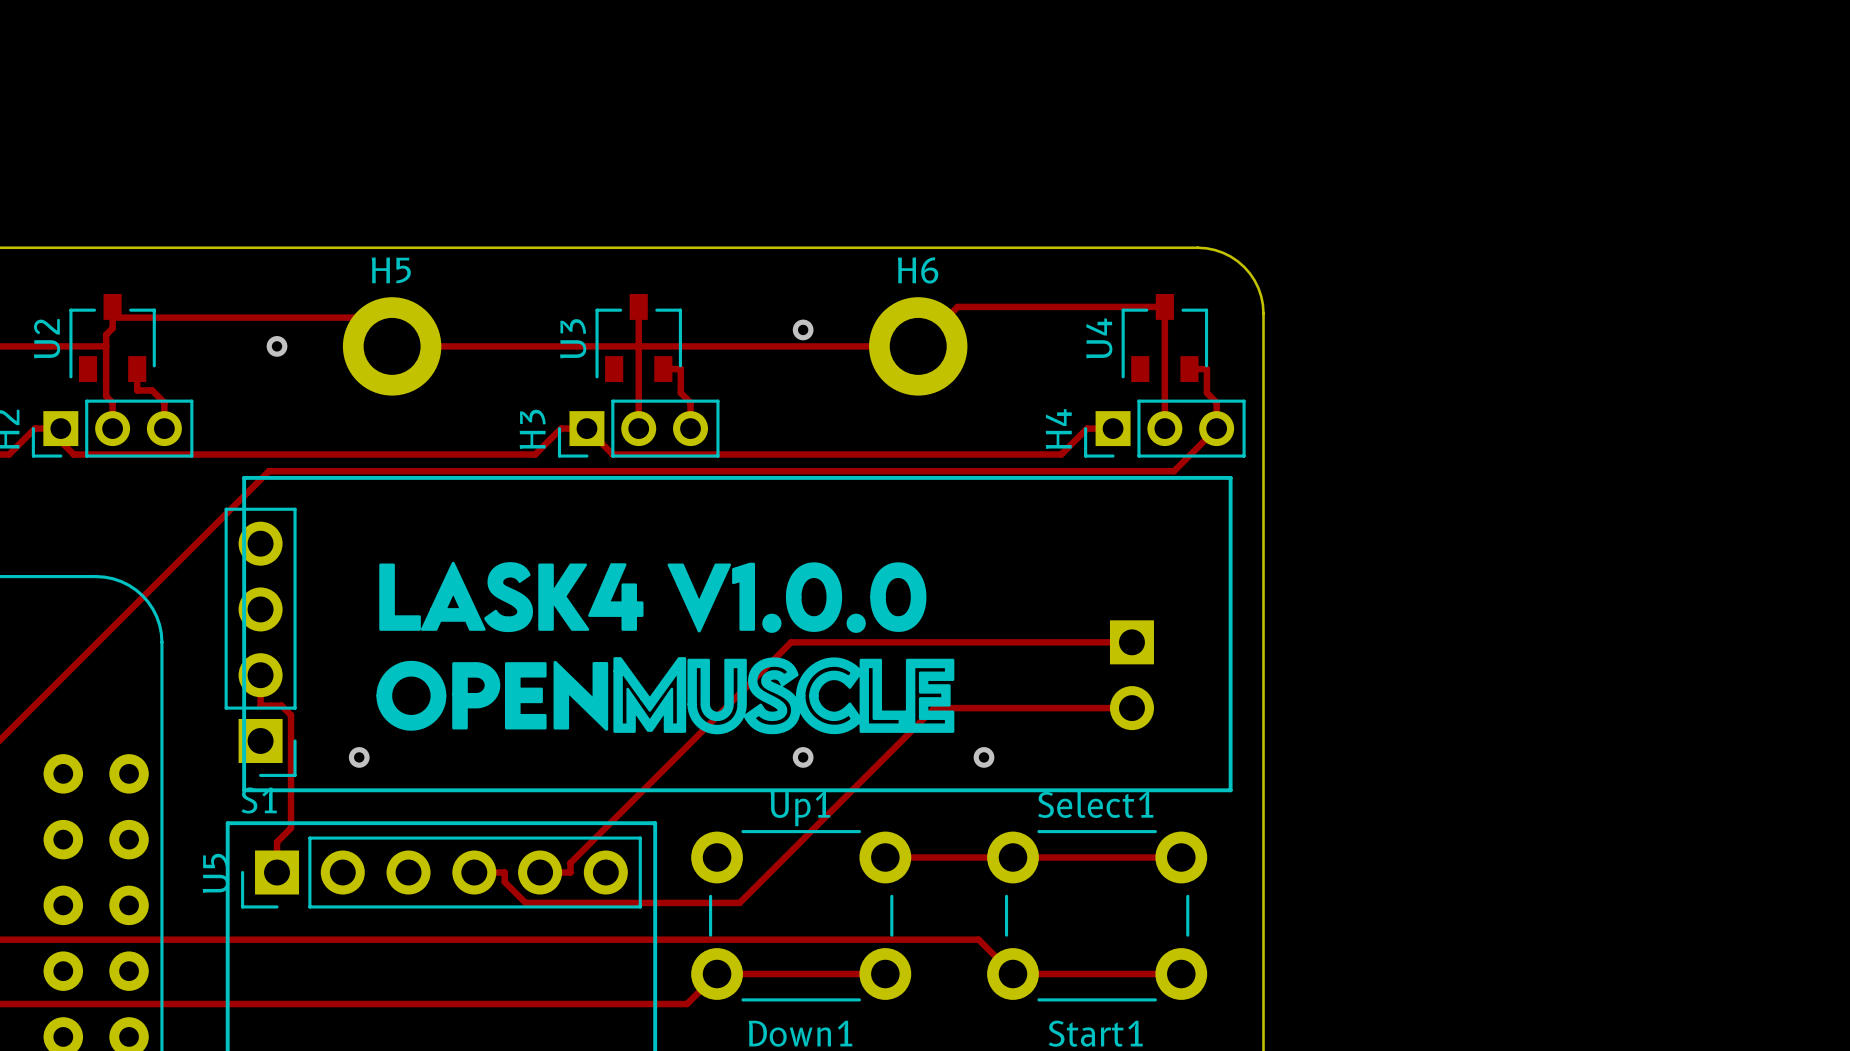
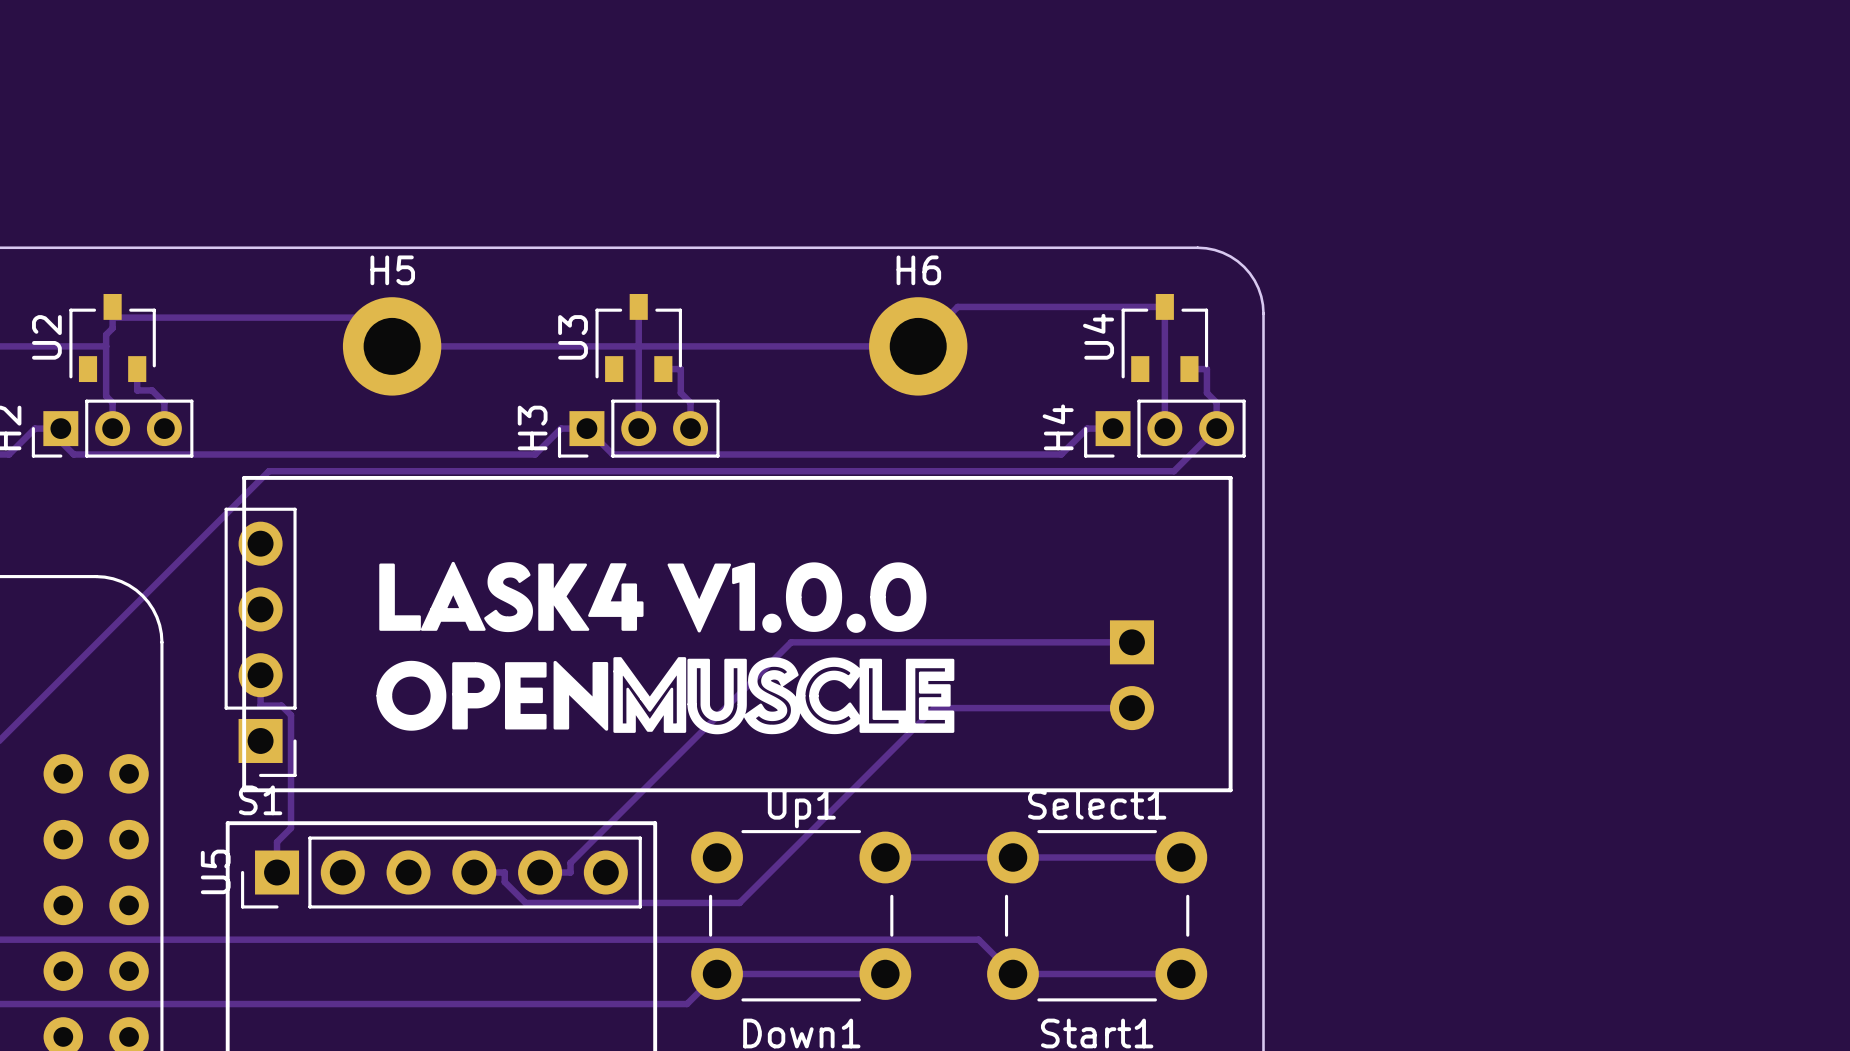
via: (803, 329) -> none
via: (277, 346) -> none
via: (359, 757) -> none
via: (803, 757) -> none
via: (984, 757) -> none

